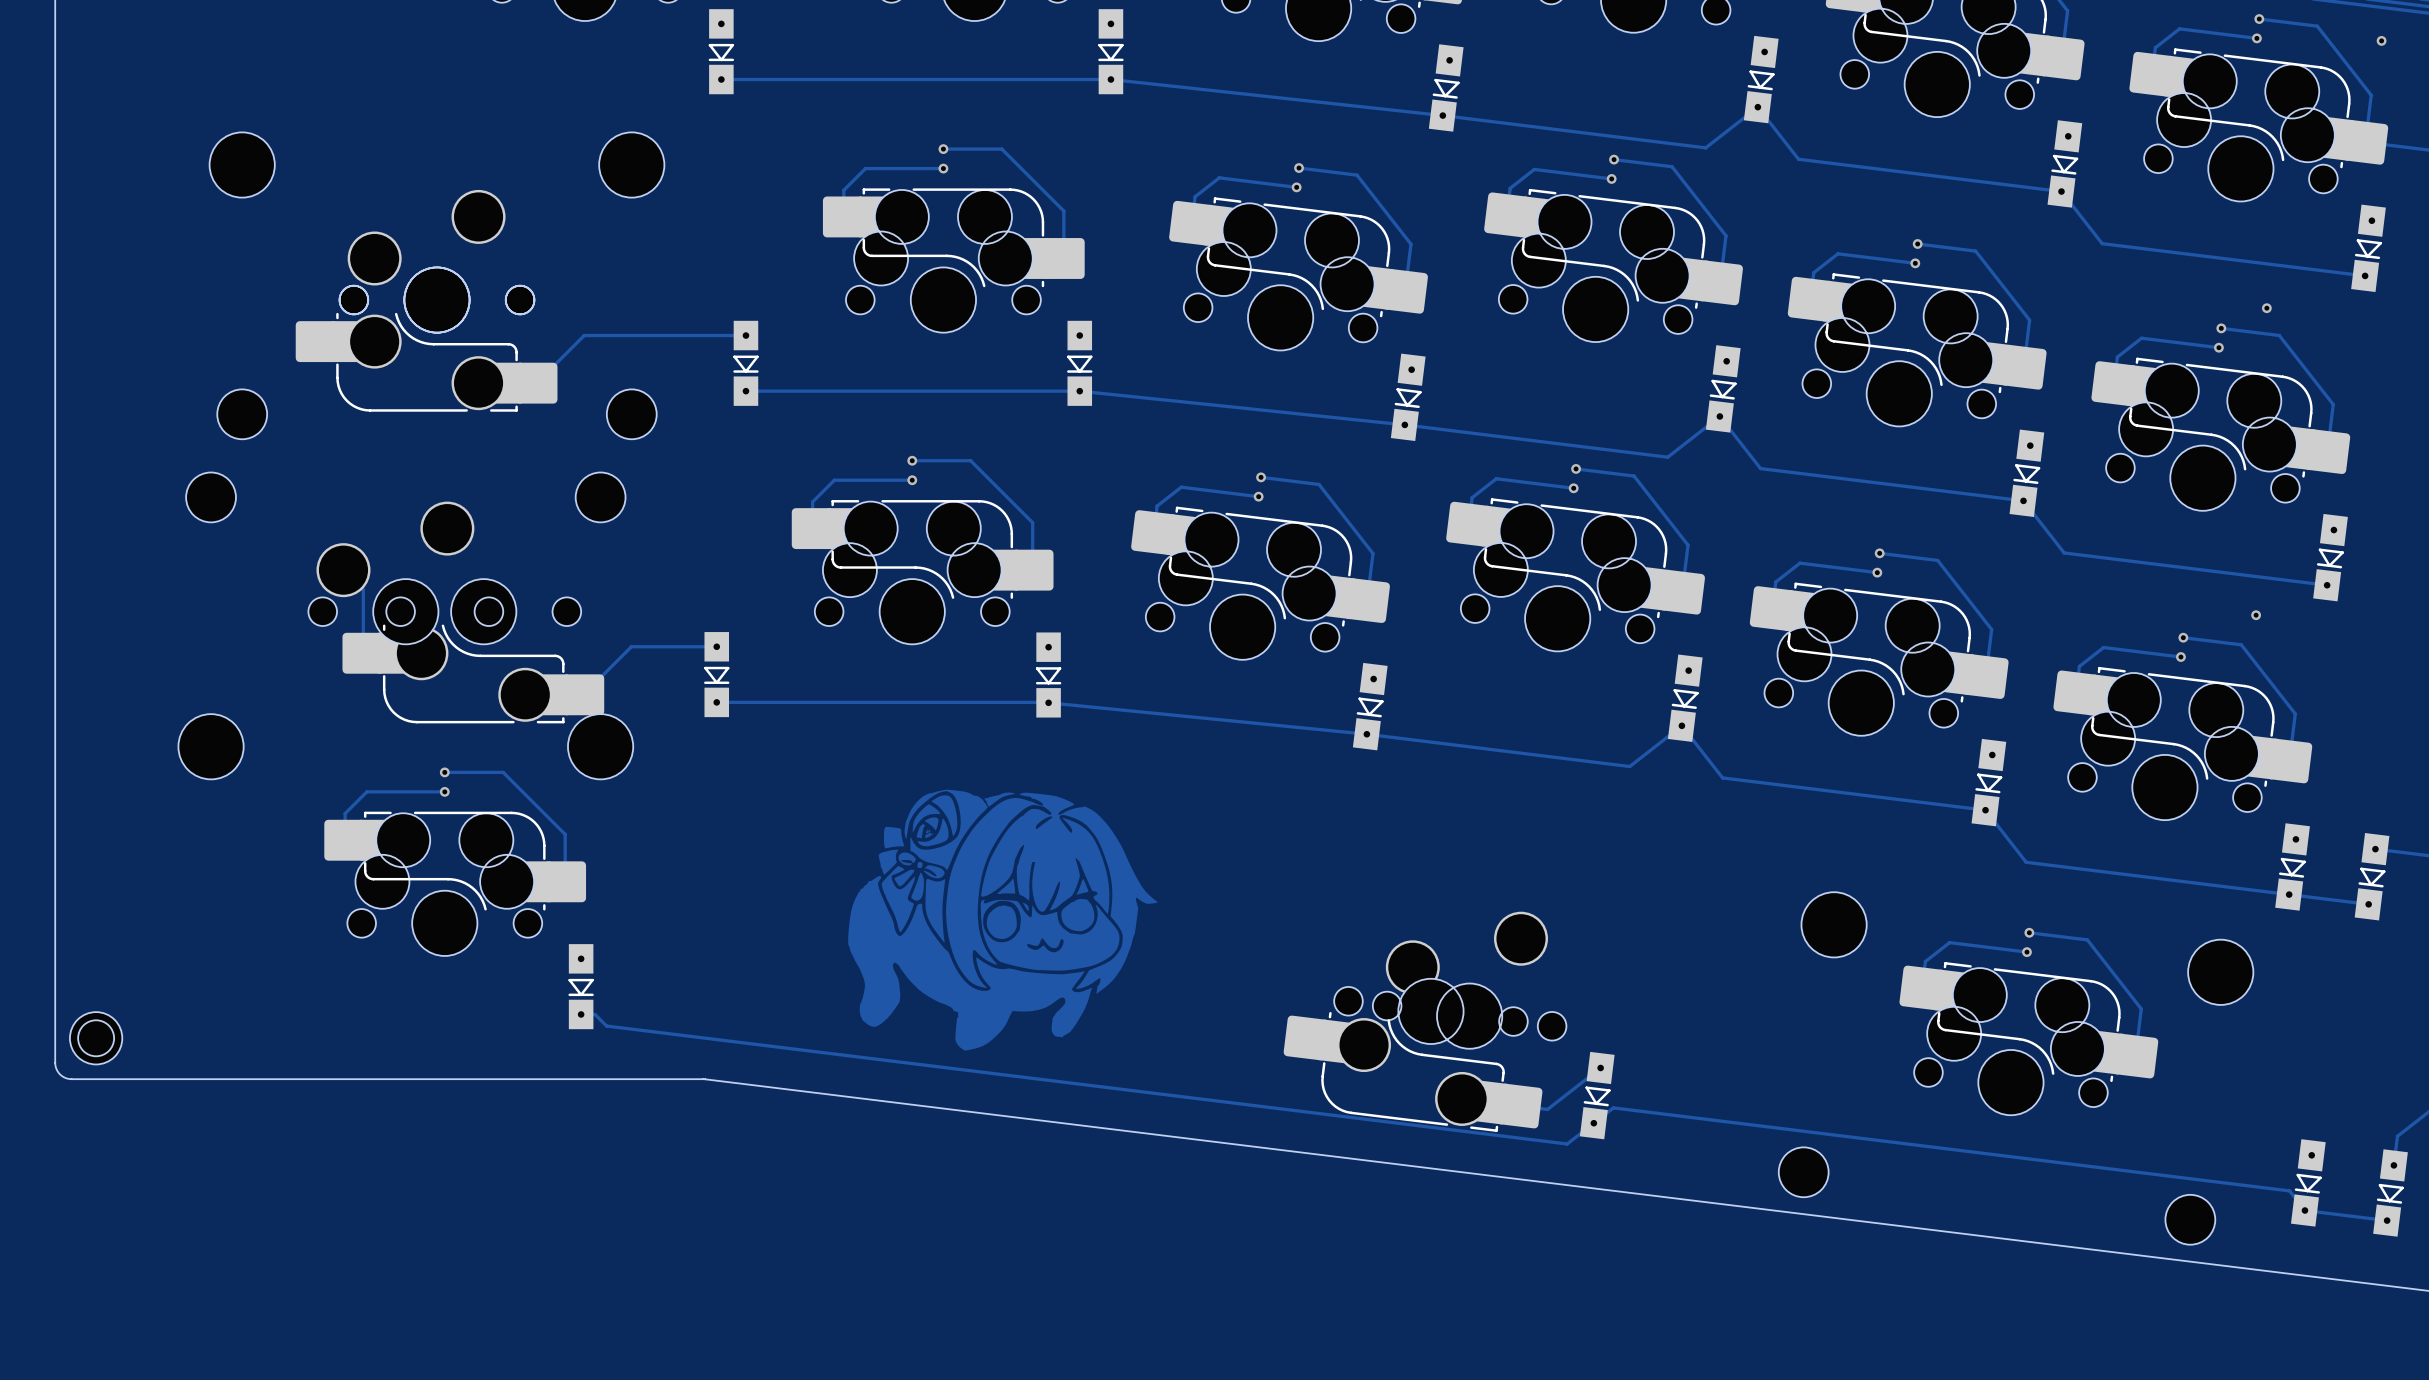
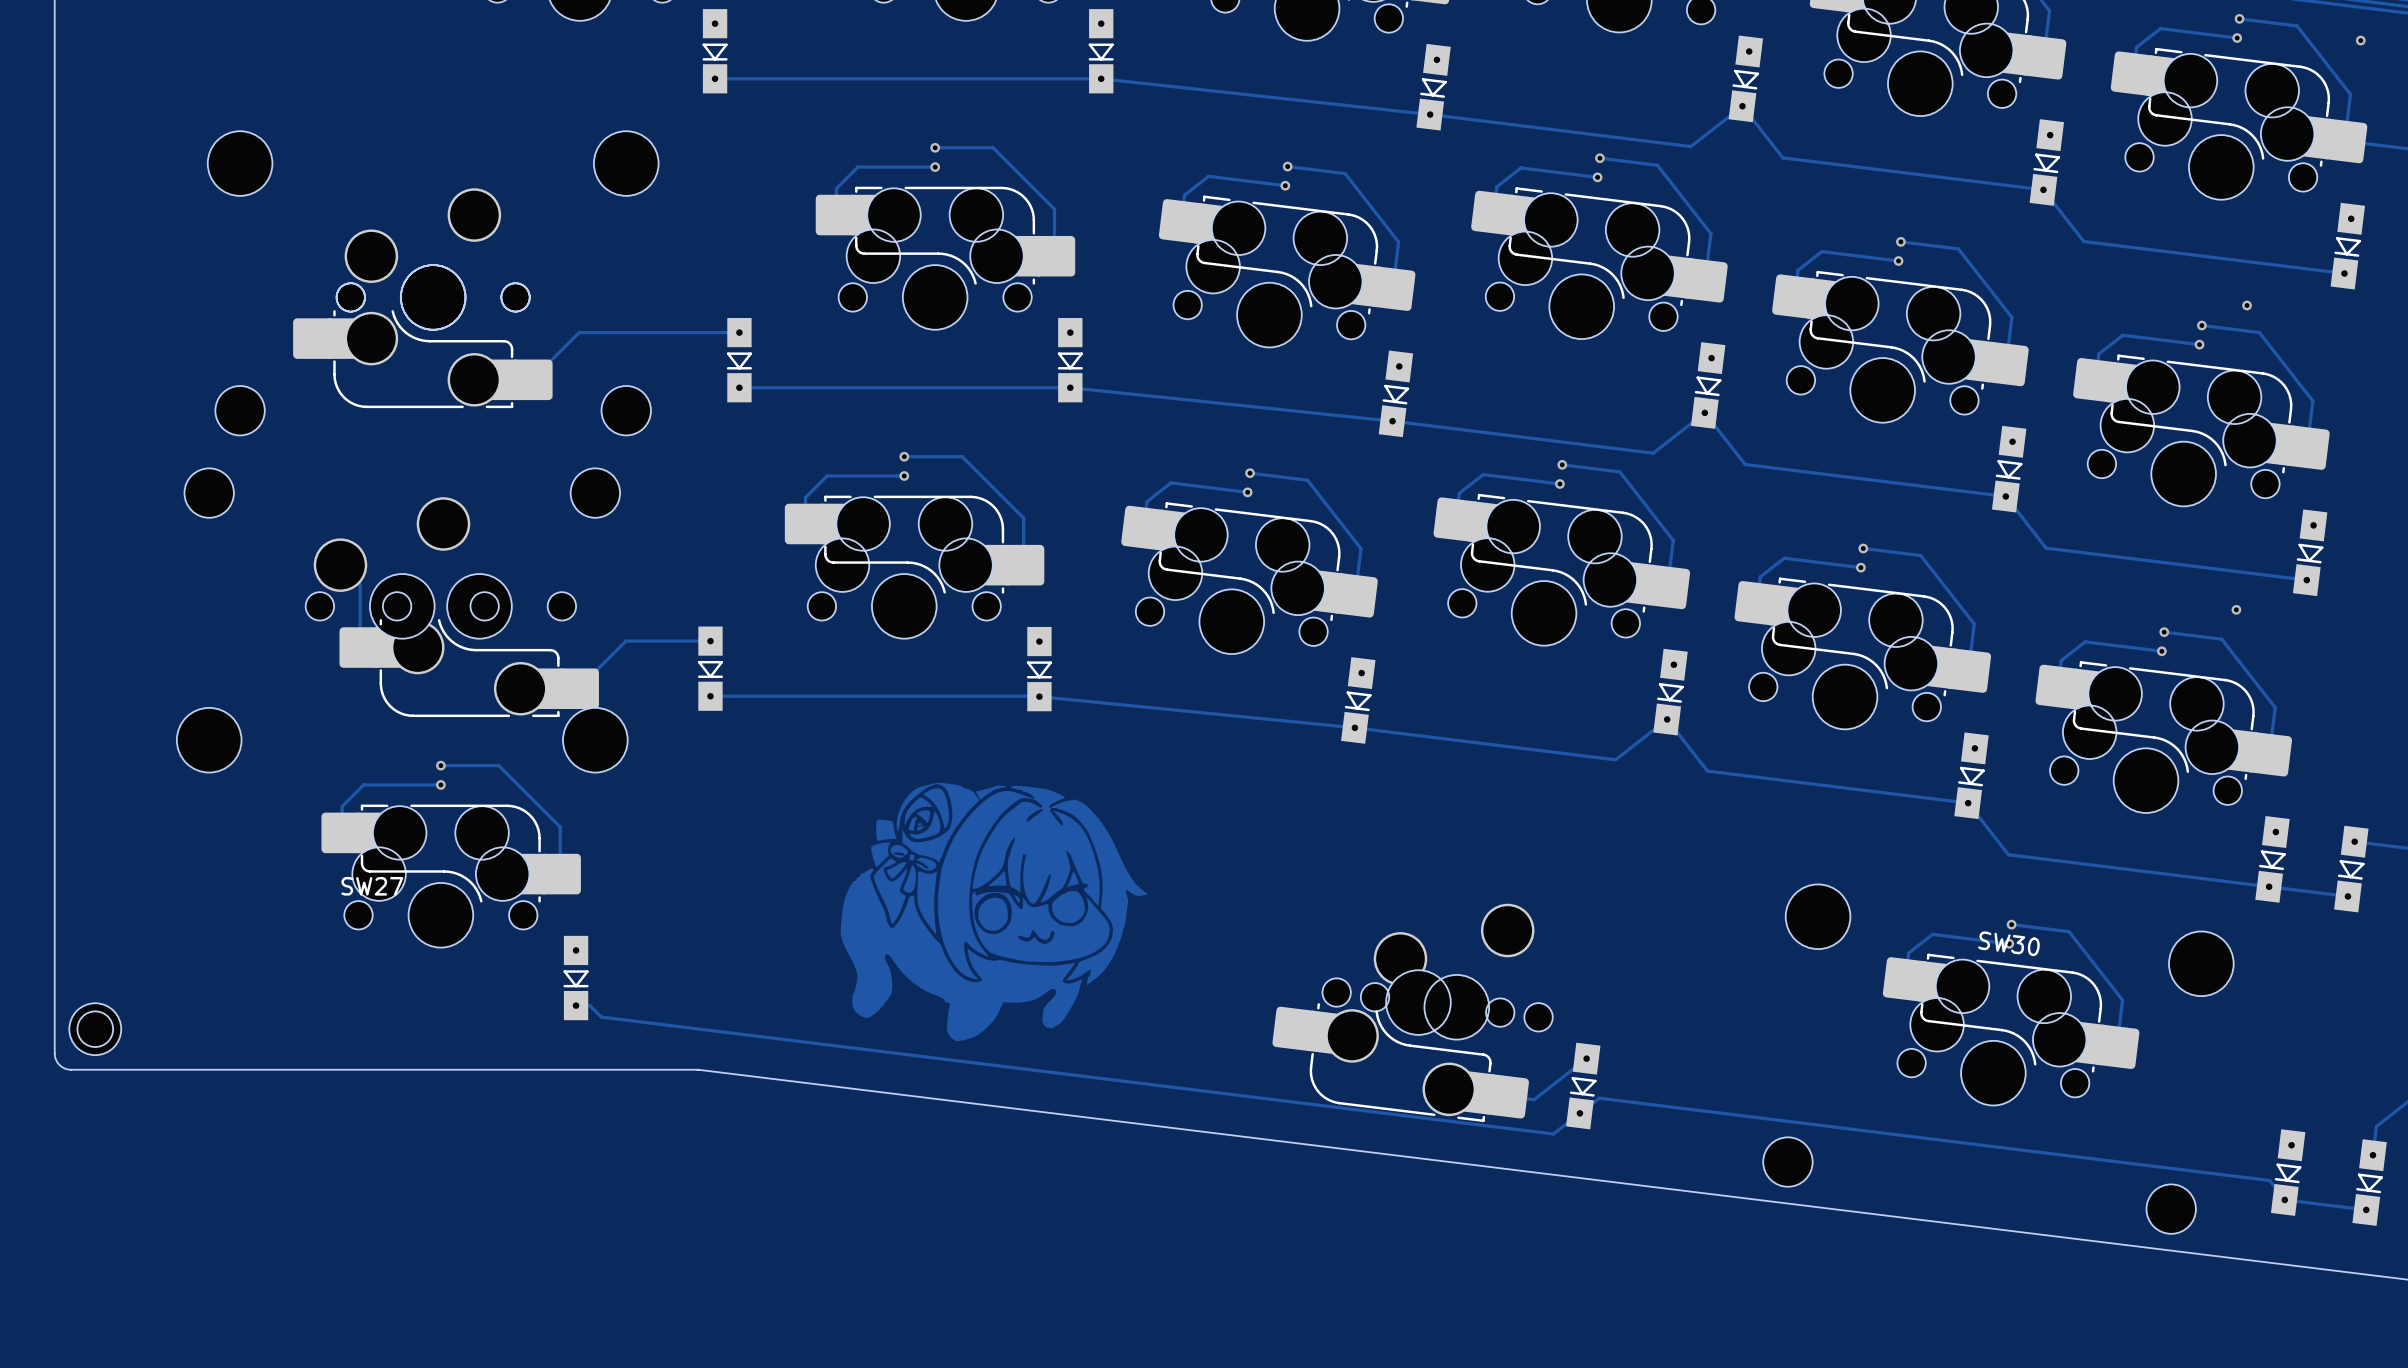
part: (455, 883) -> none
SW27: none -> (451, 876)
SW30 name: none -> SW30 (2008, 943)

